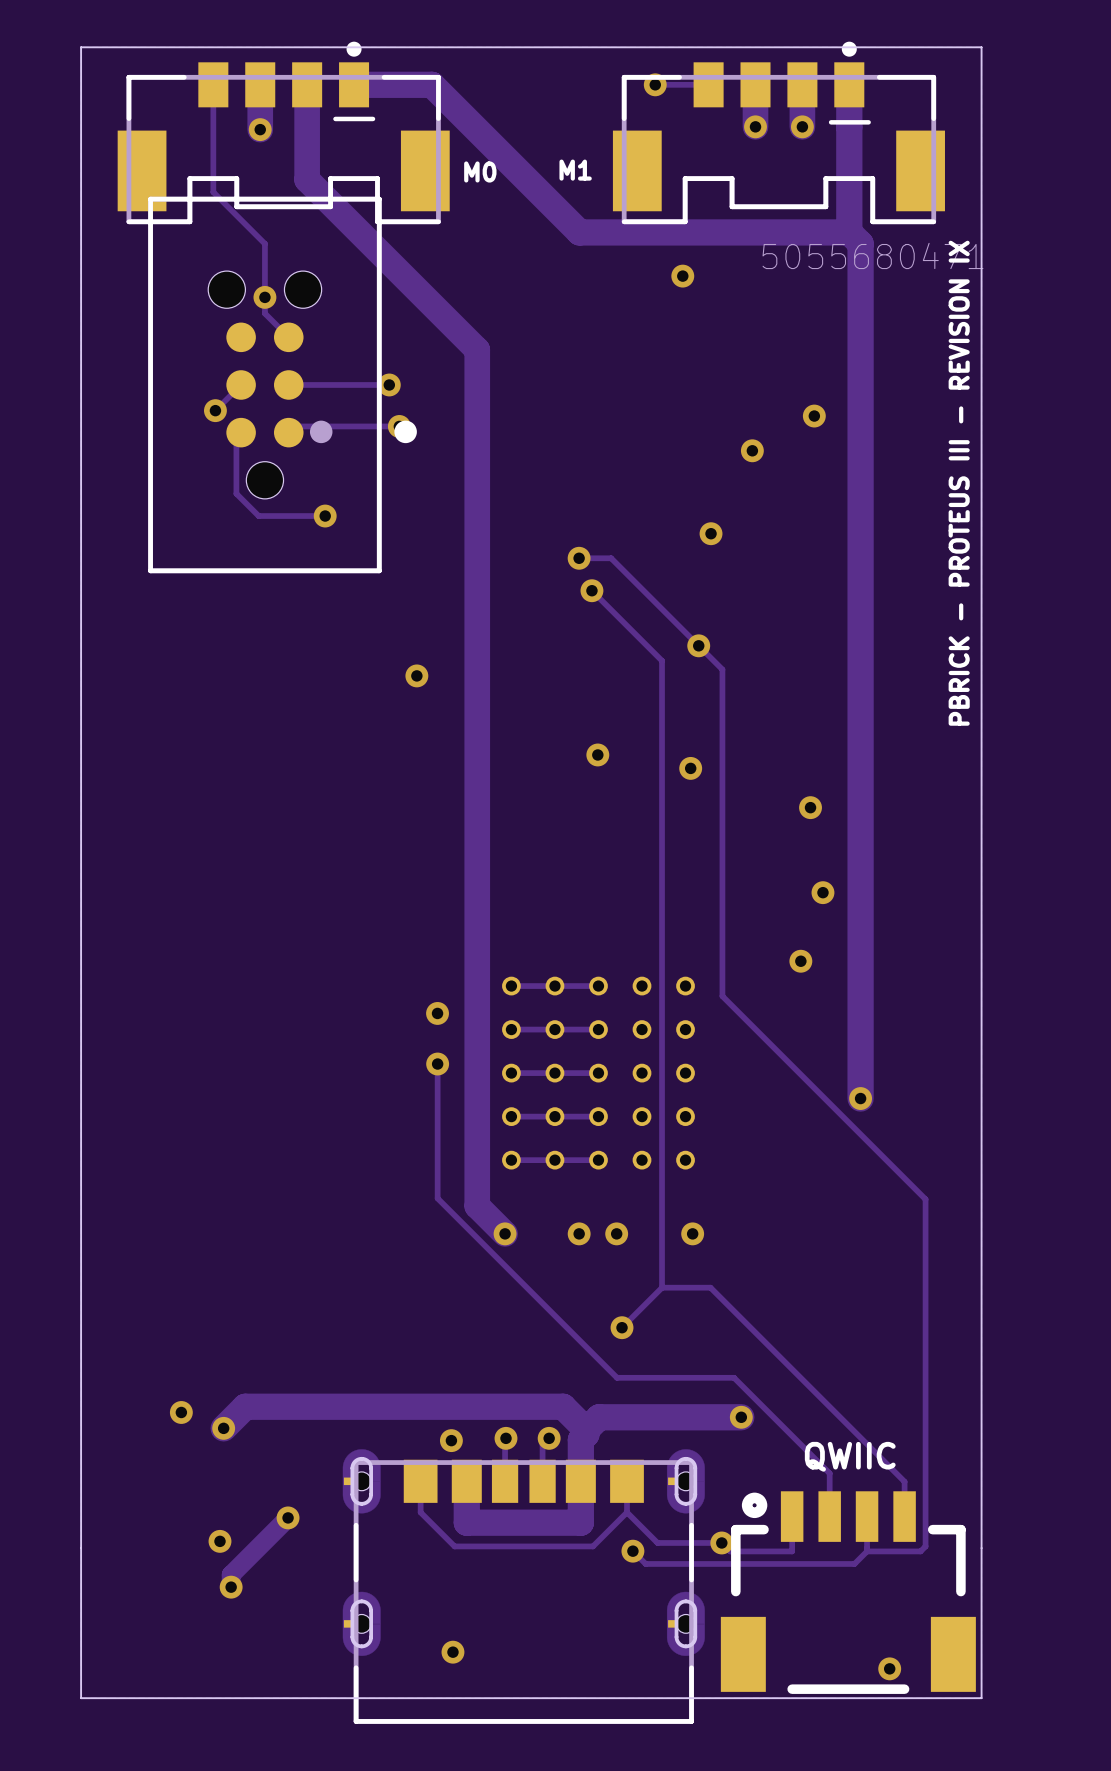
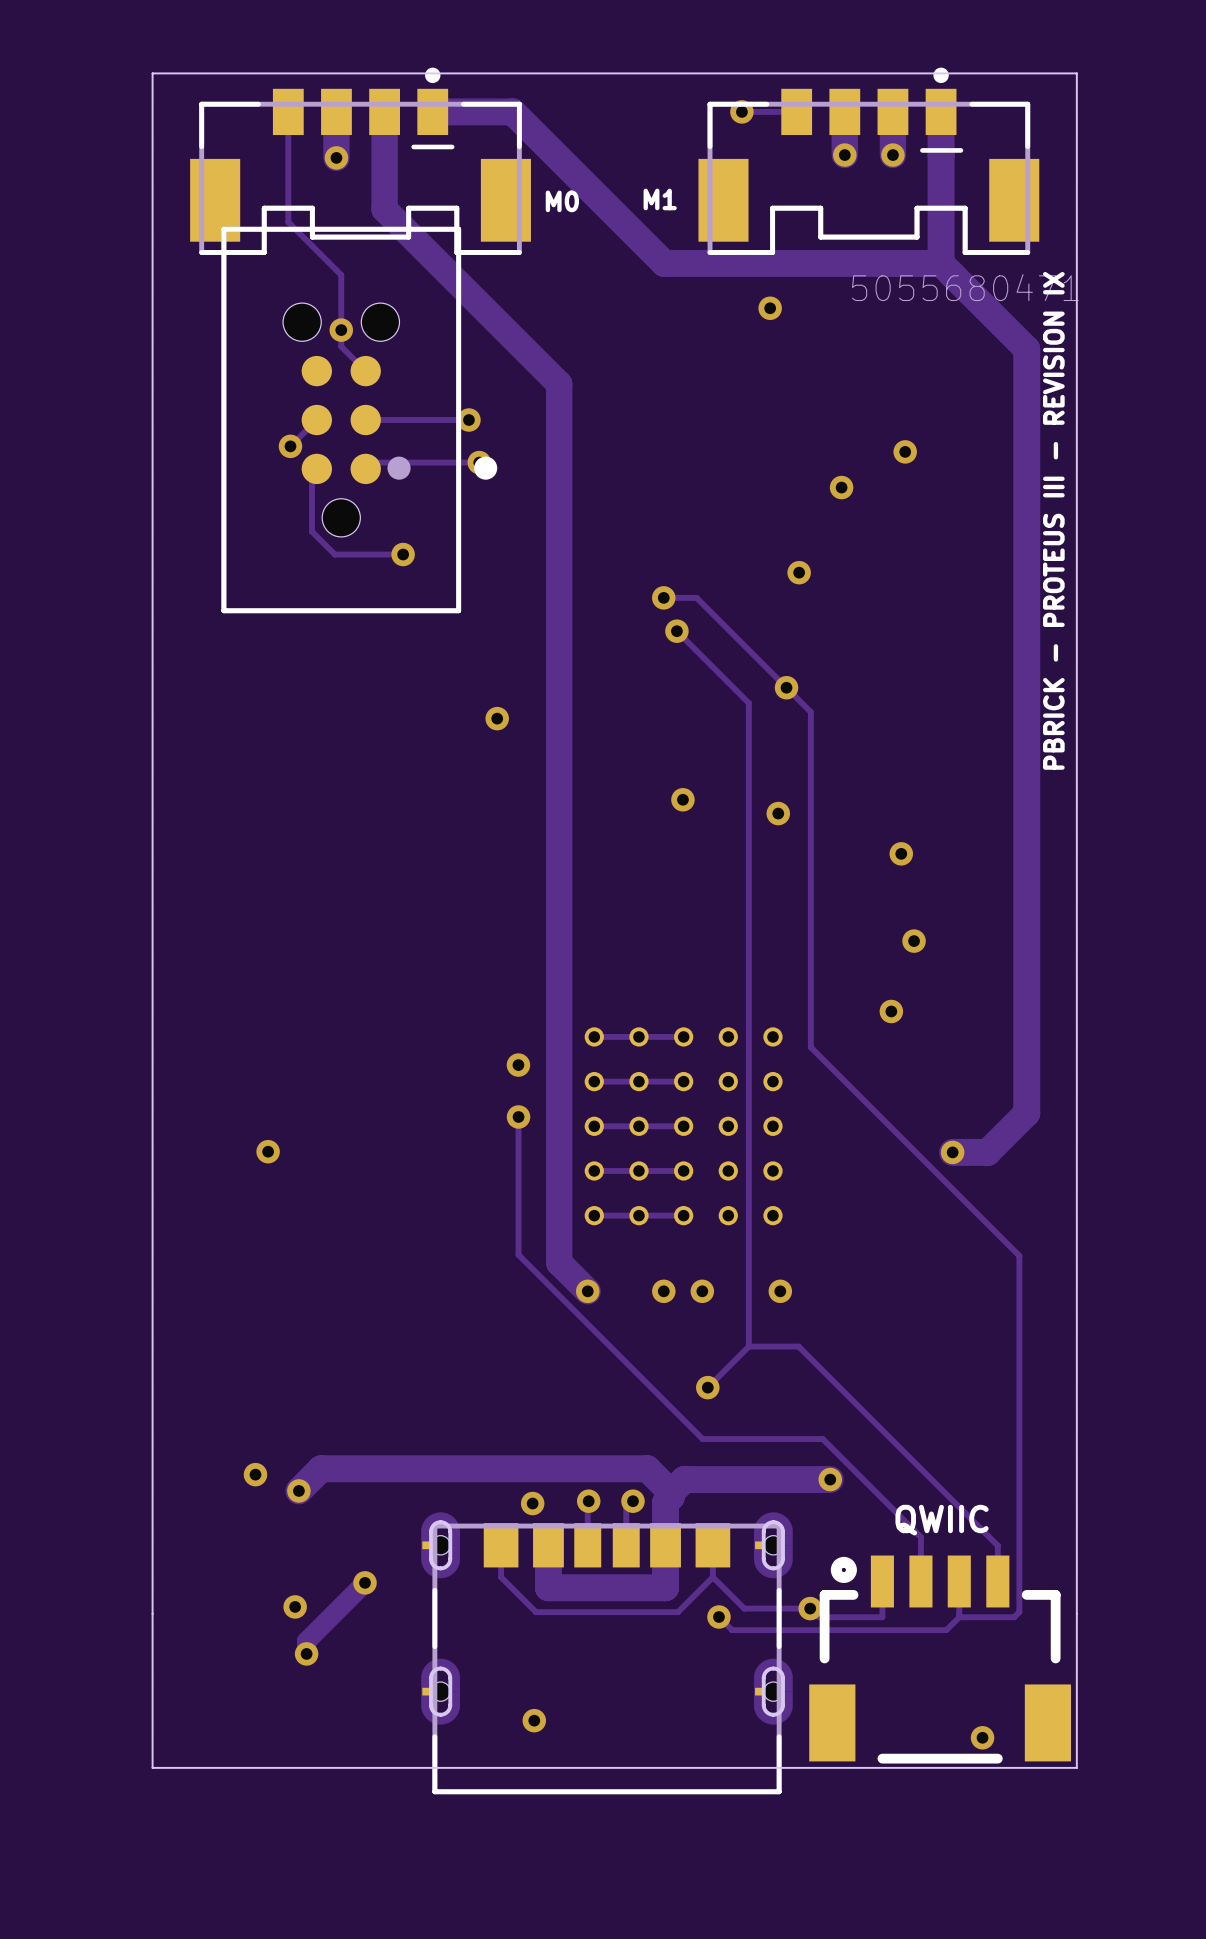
track: (860, 243) (860, 1098) -> (952, 275) (1026, 349) (1026, 1113) (987, 1152) (952, 1152)
via: none -> (268, 1151)

